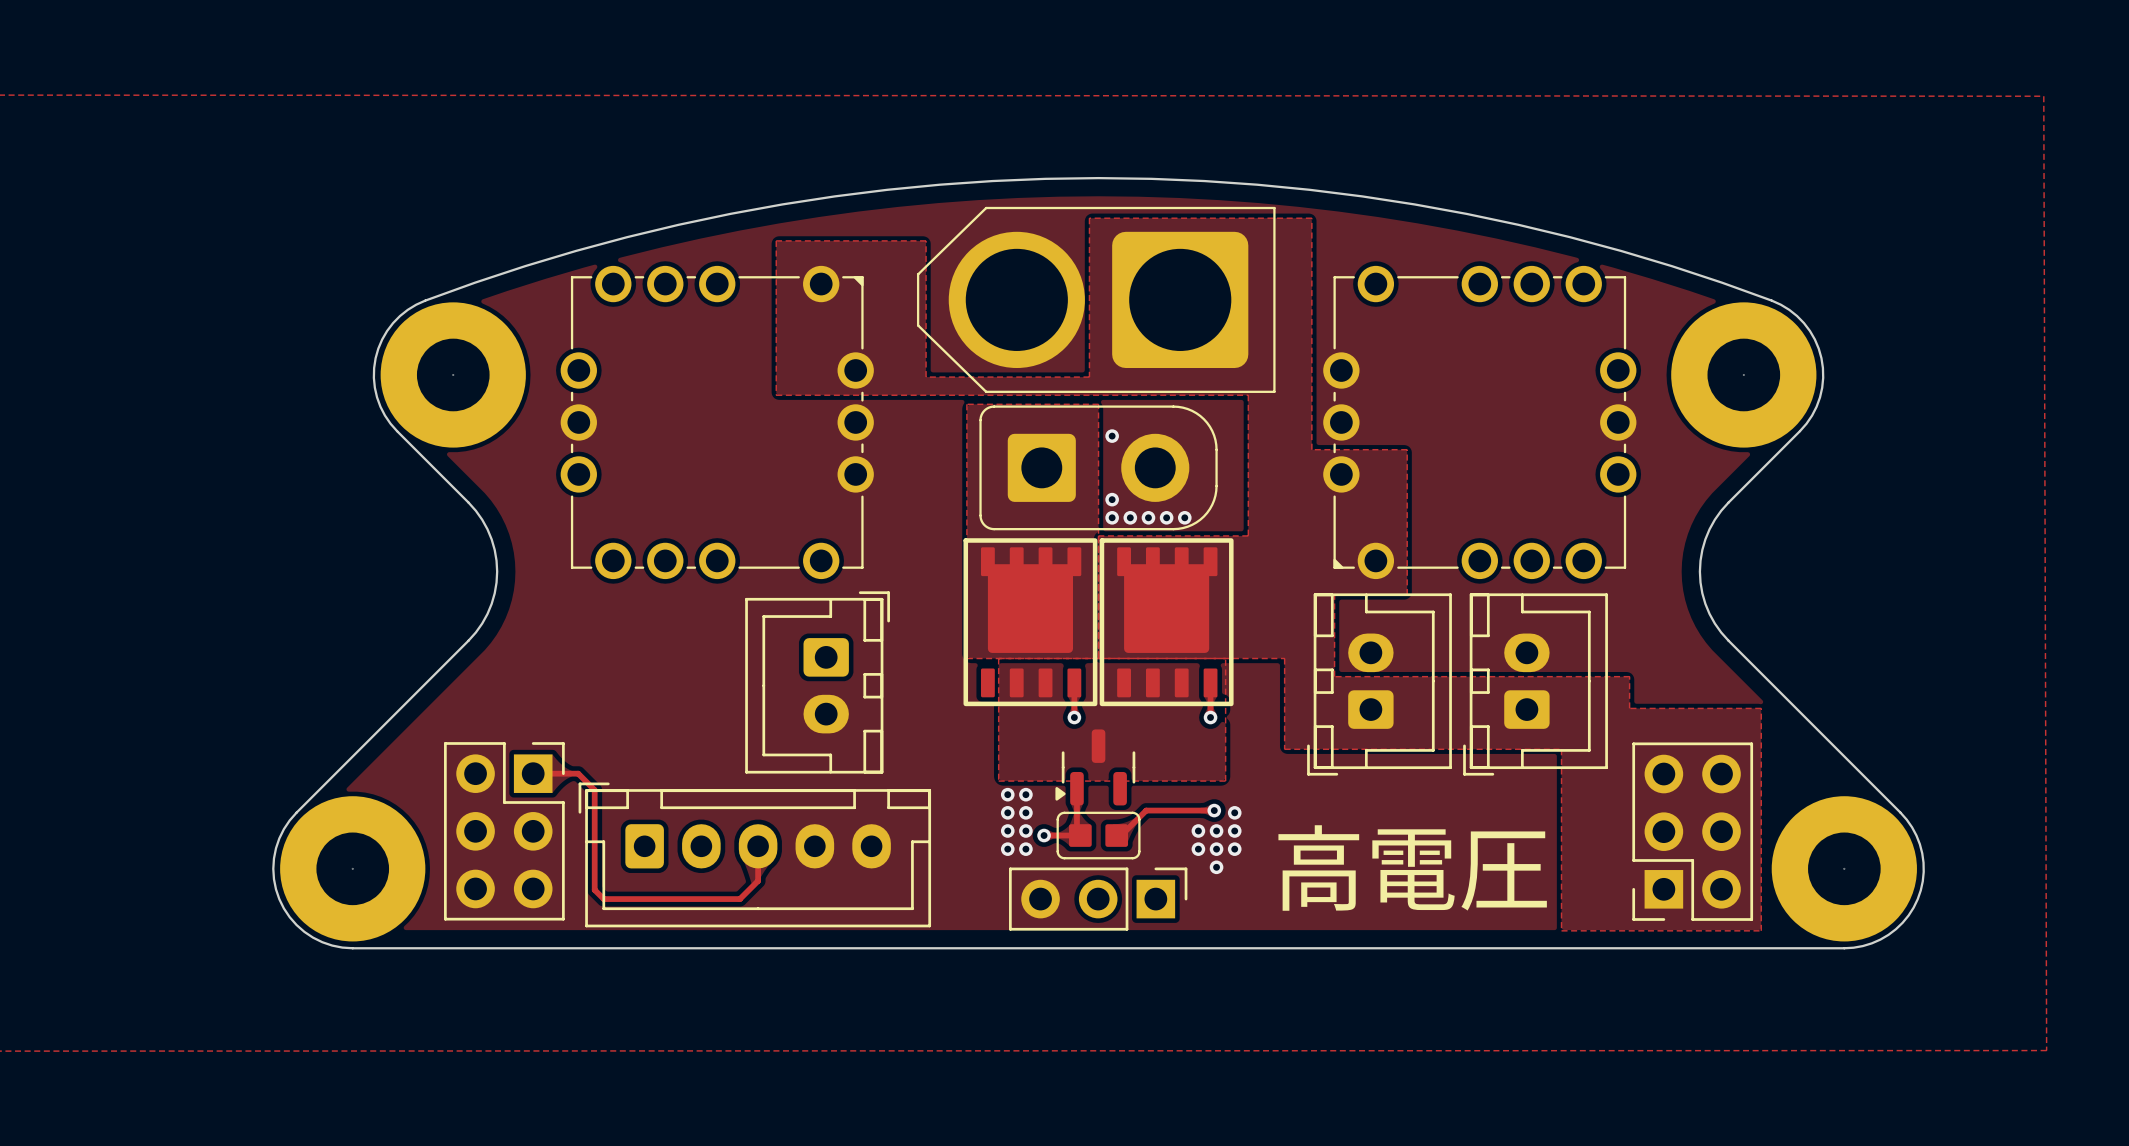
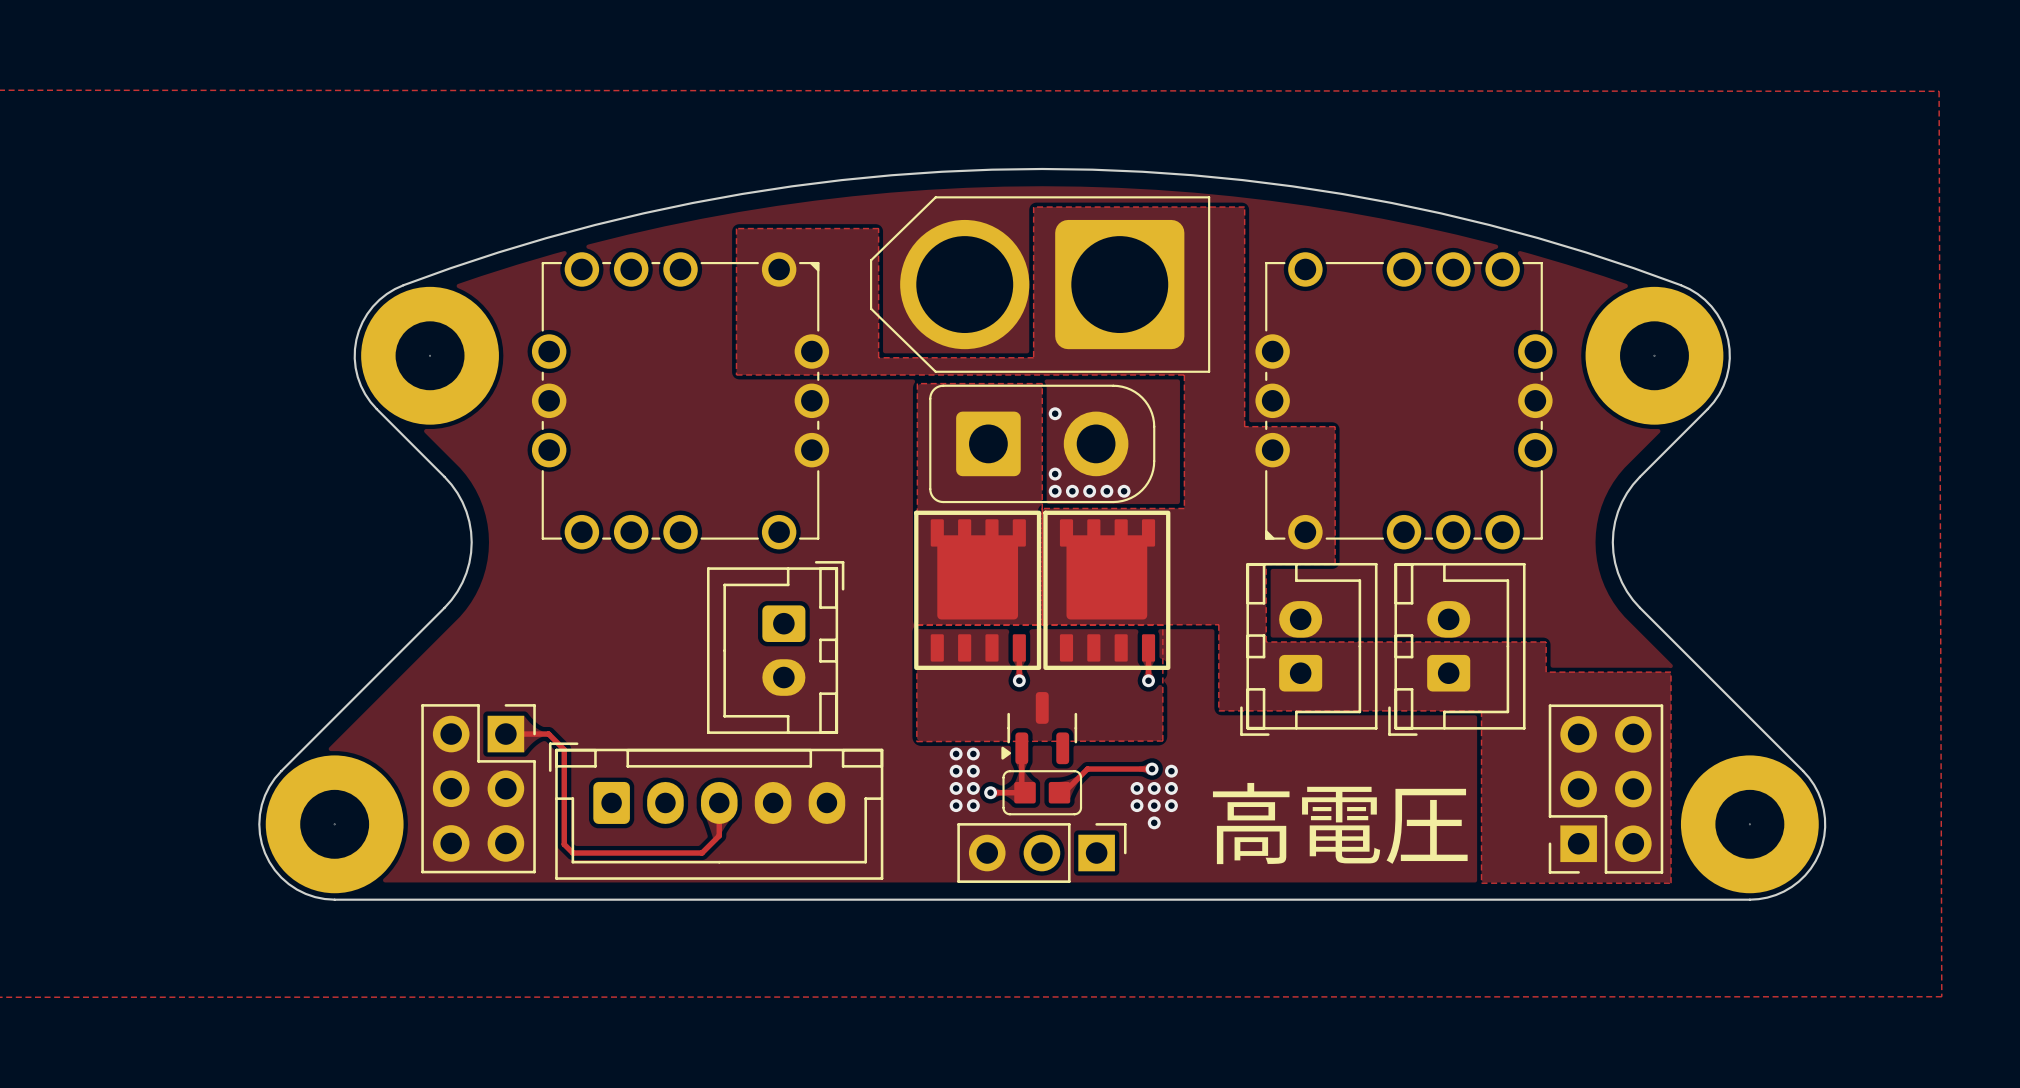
zone outline: (998, 658) (998, 781) (1225, 781) -> (1162, 624) (916, 625) (916, 741) (1162, 741)

